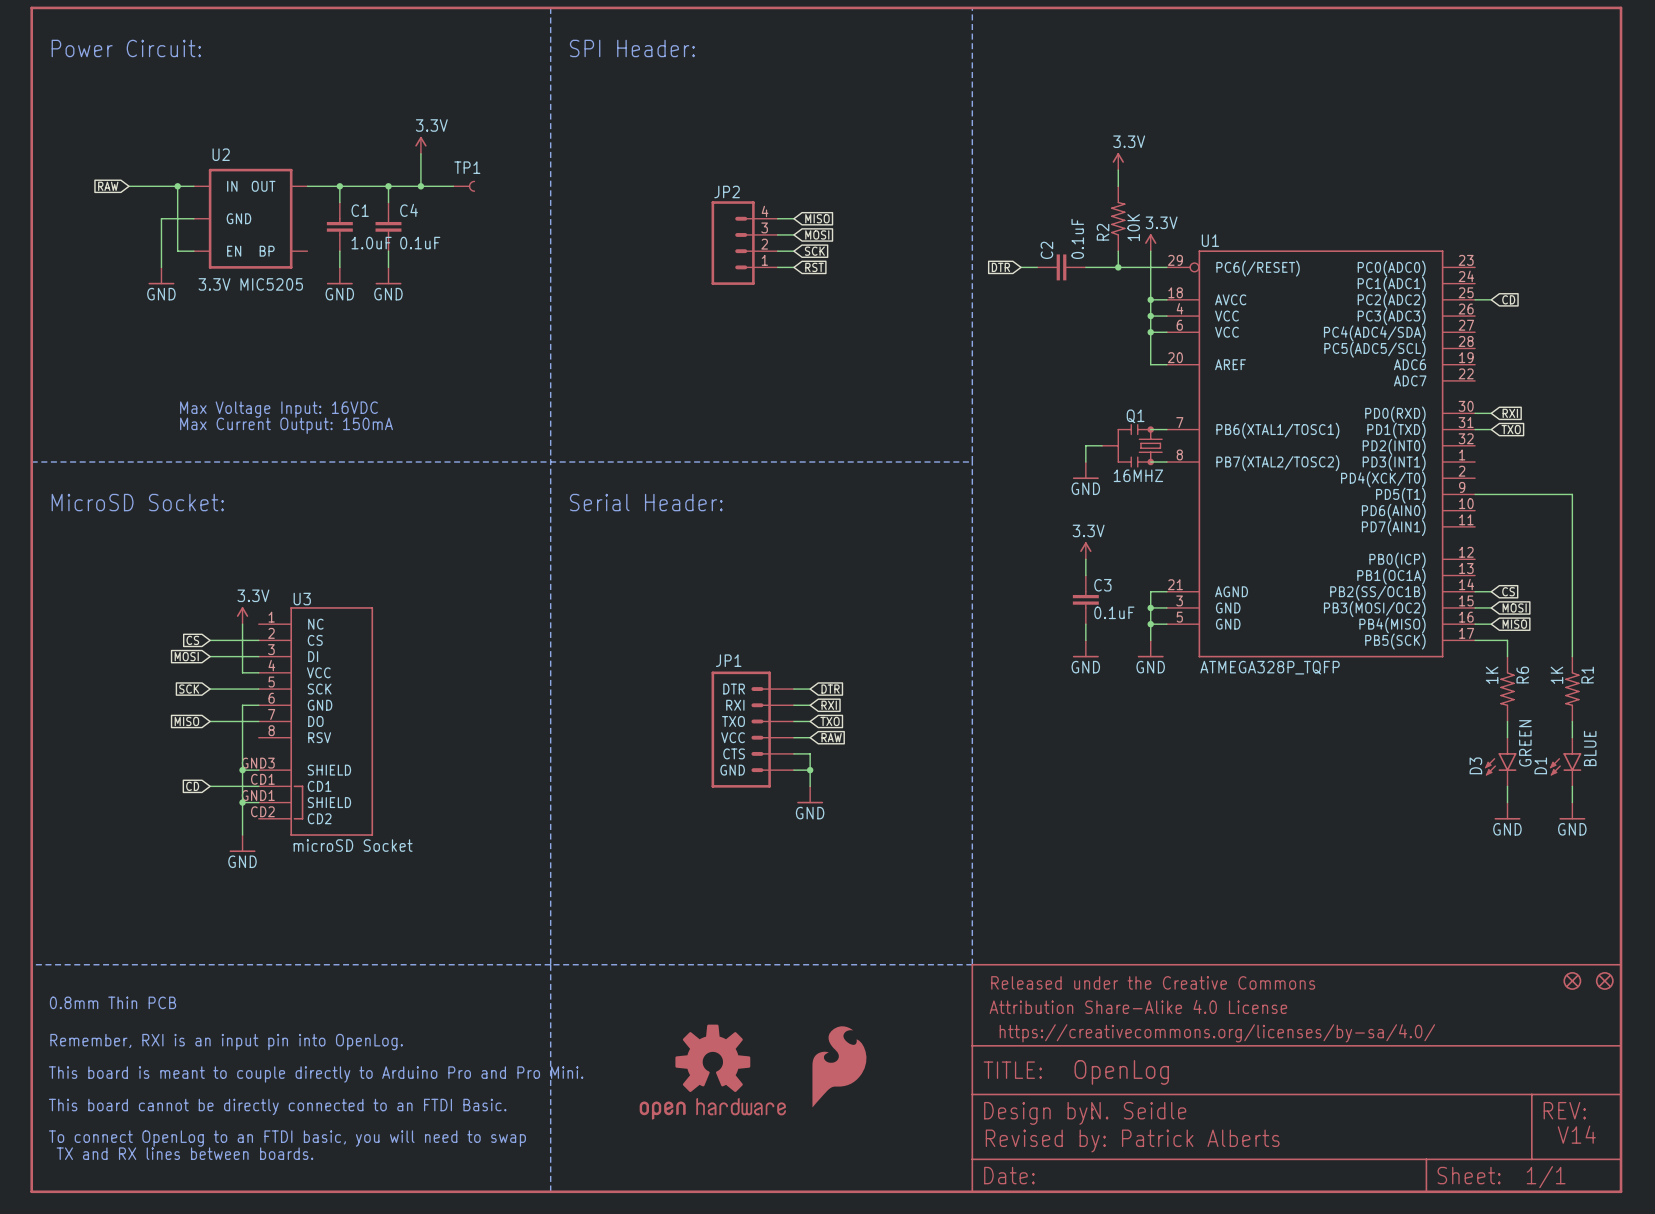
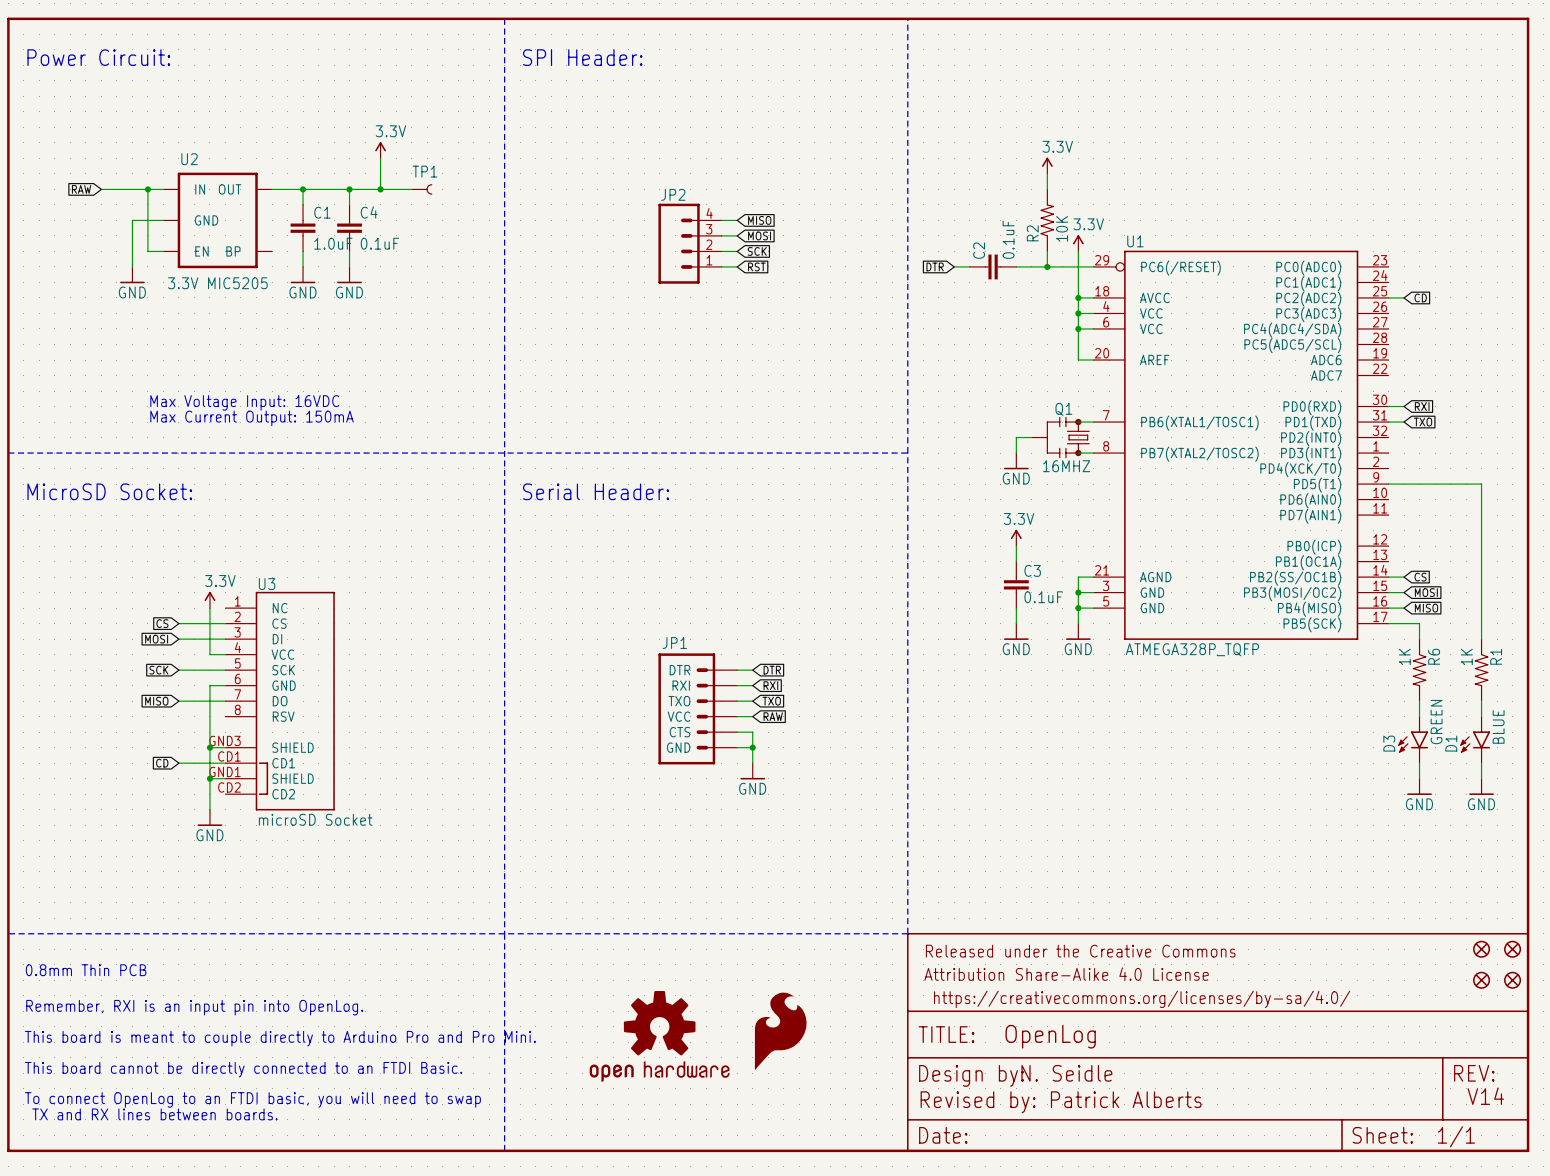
part: none -> (1481, 980)
part: none -> (1512, 980)

